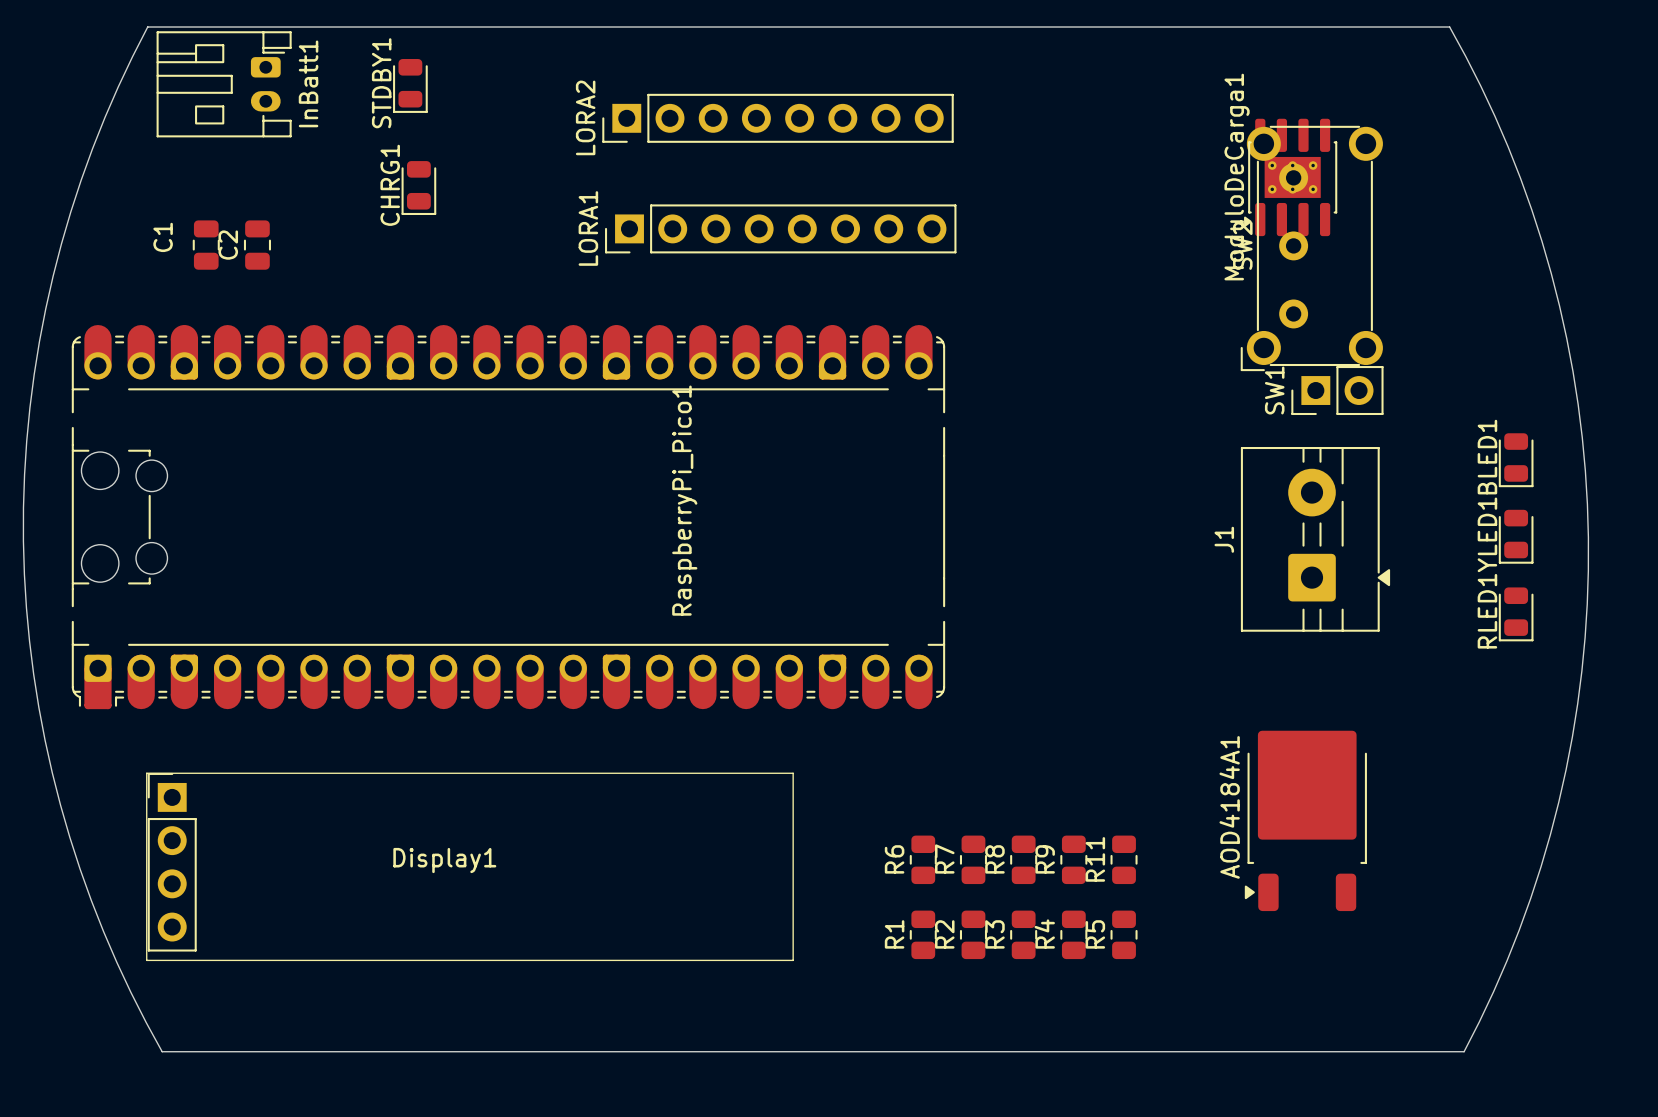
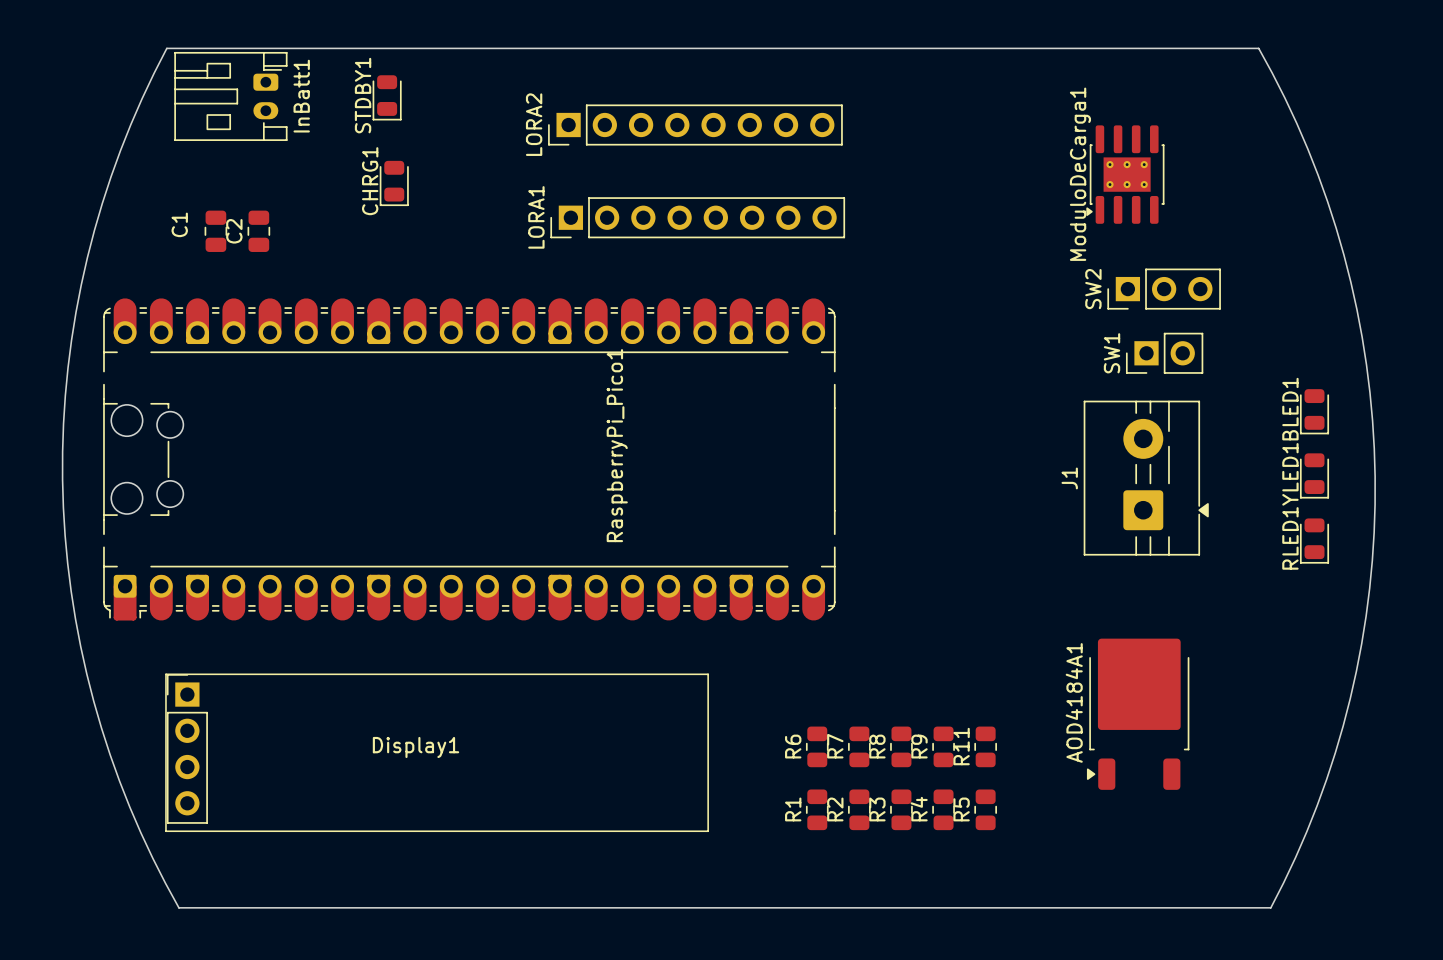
SW2 footprint: [1240, 125, 1383, 372] -> [1107, 268, 1221, 310]

